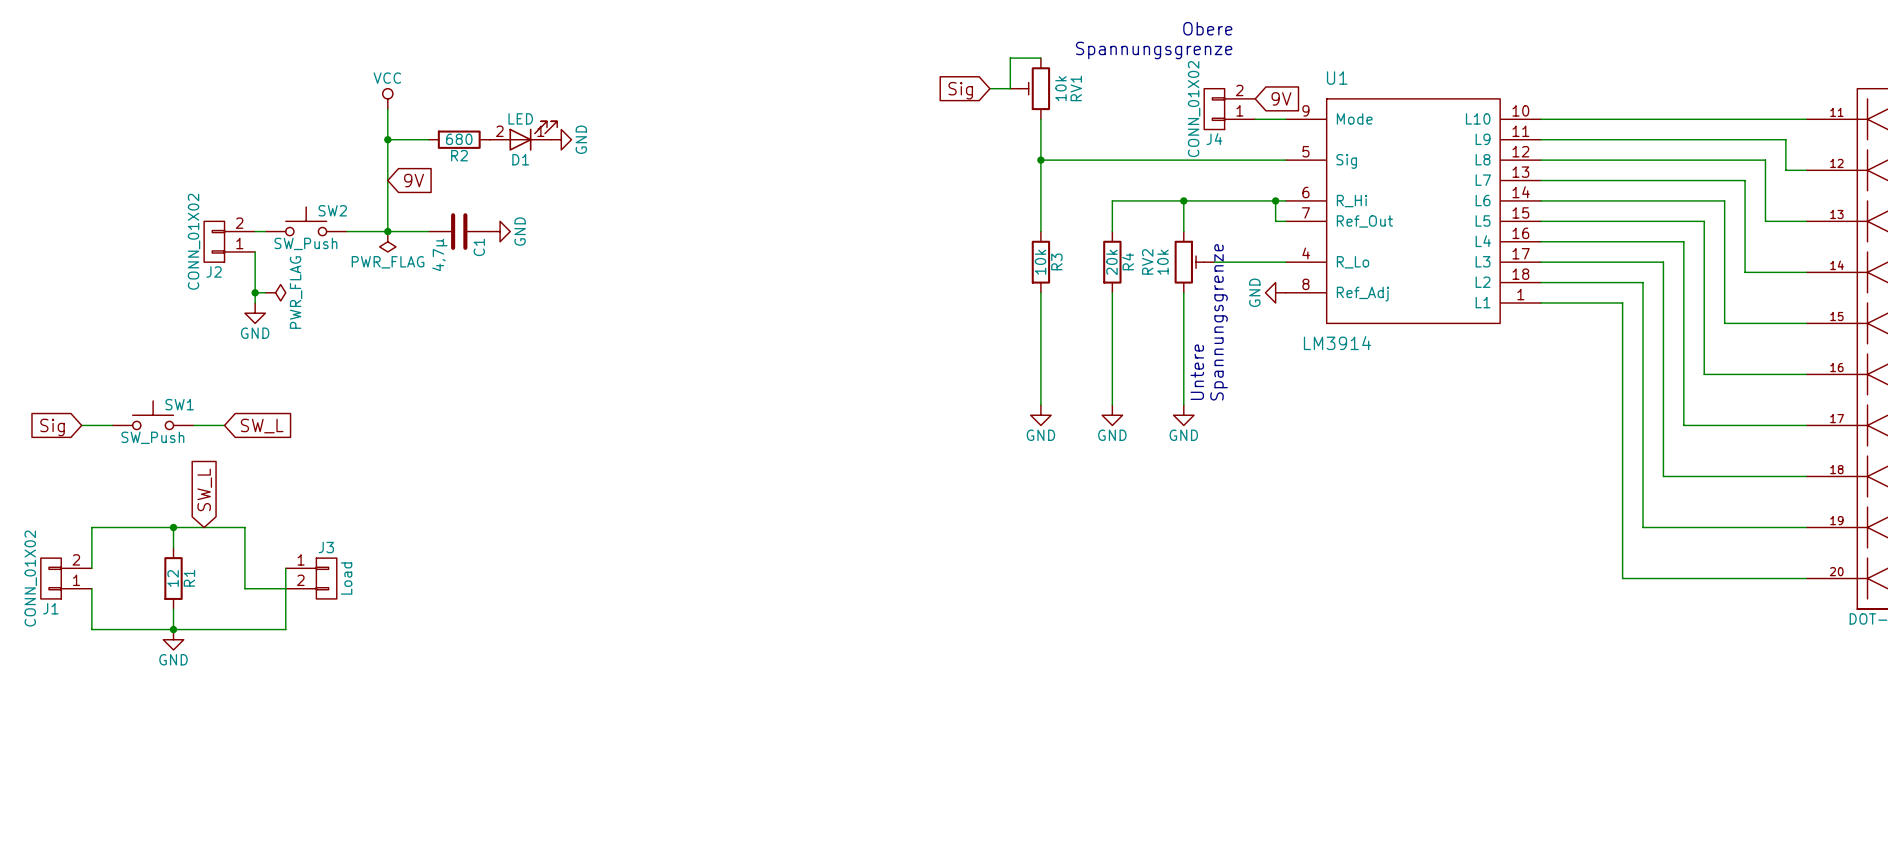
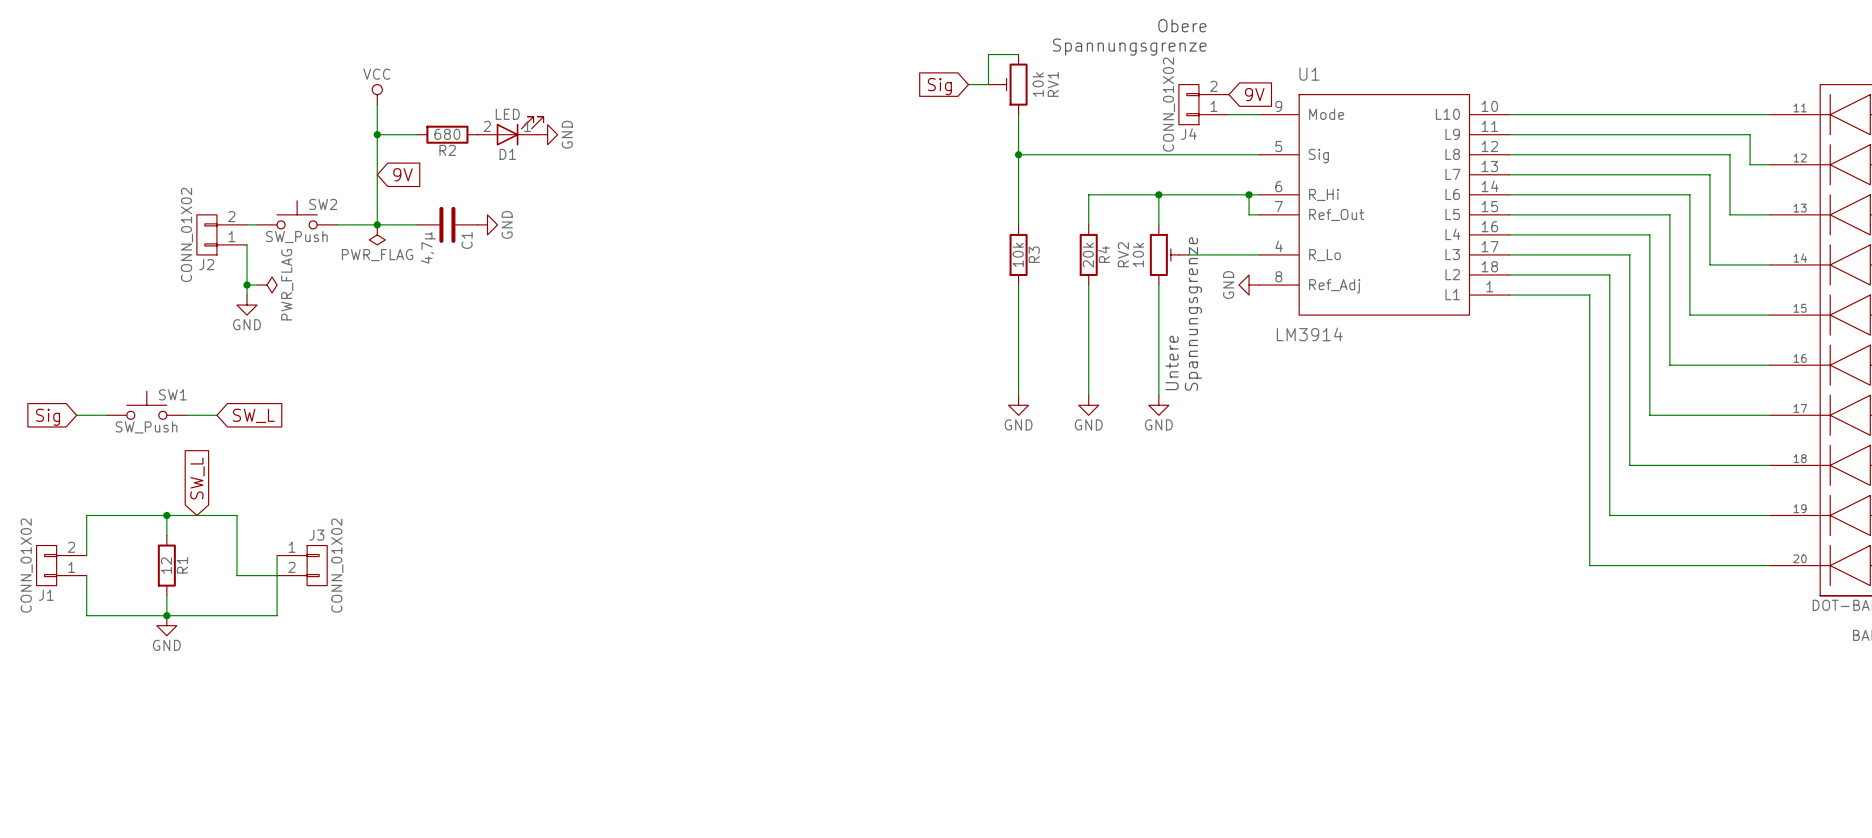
J3 value: Load (346, 578) -> CONN_01X02 (337, 565)

